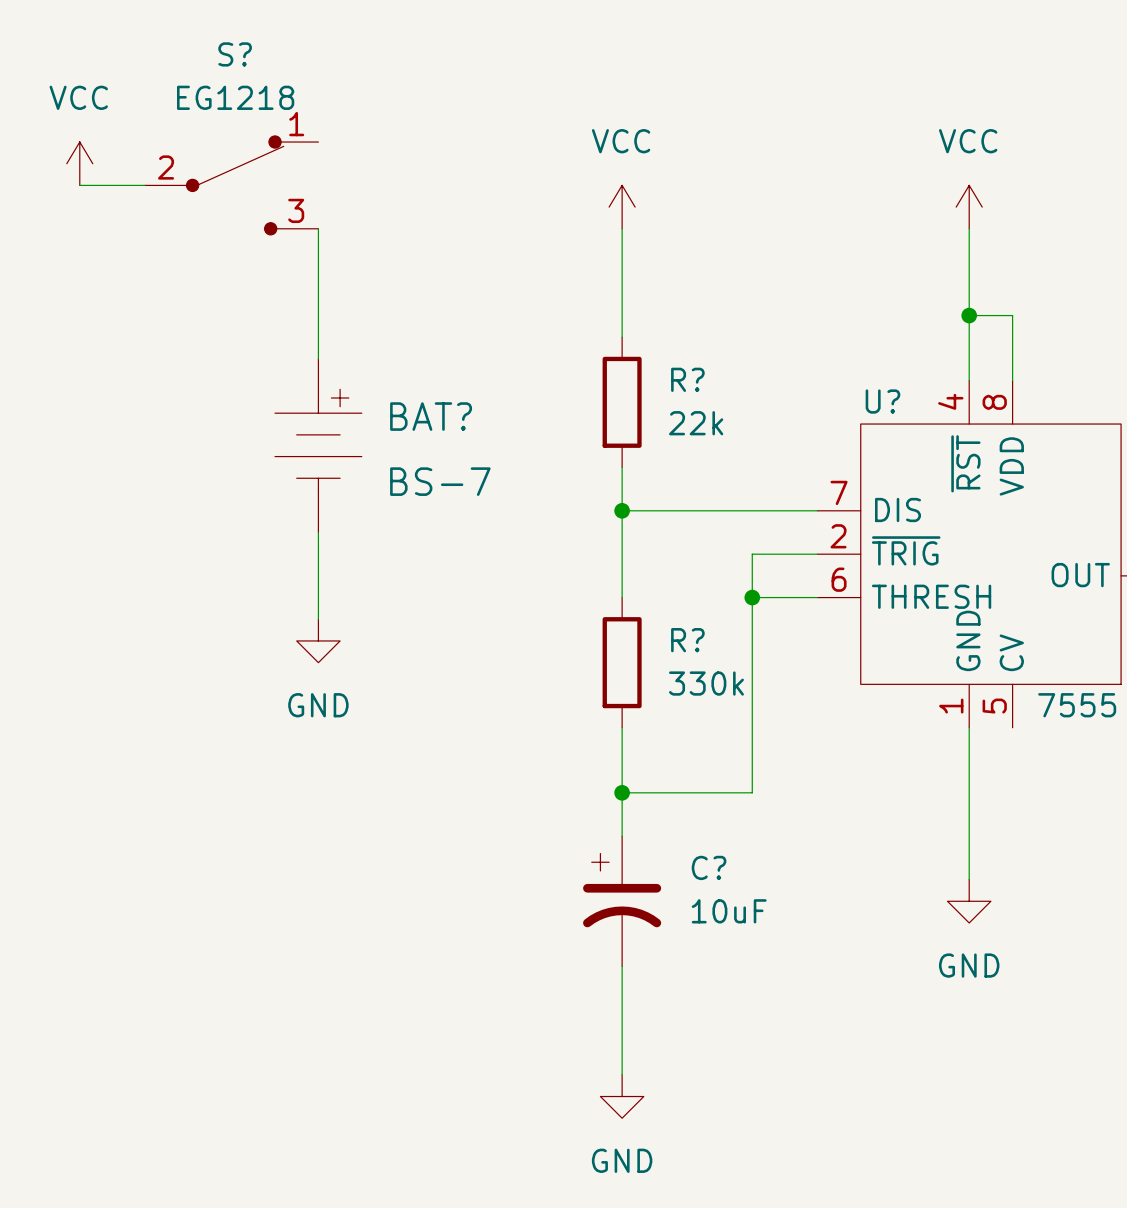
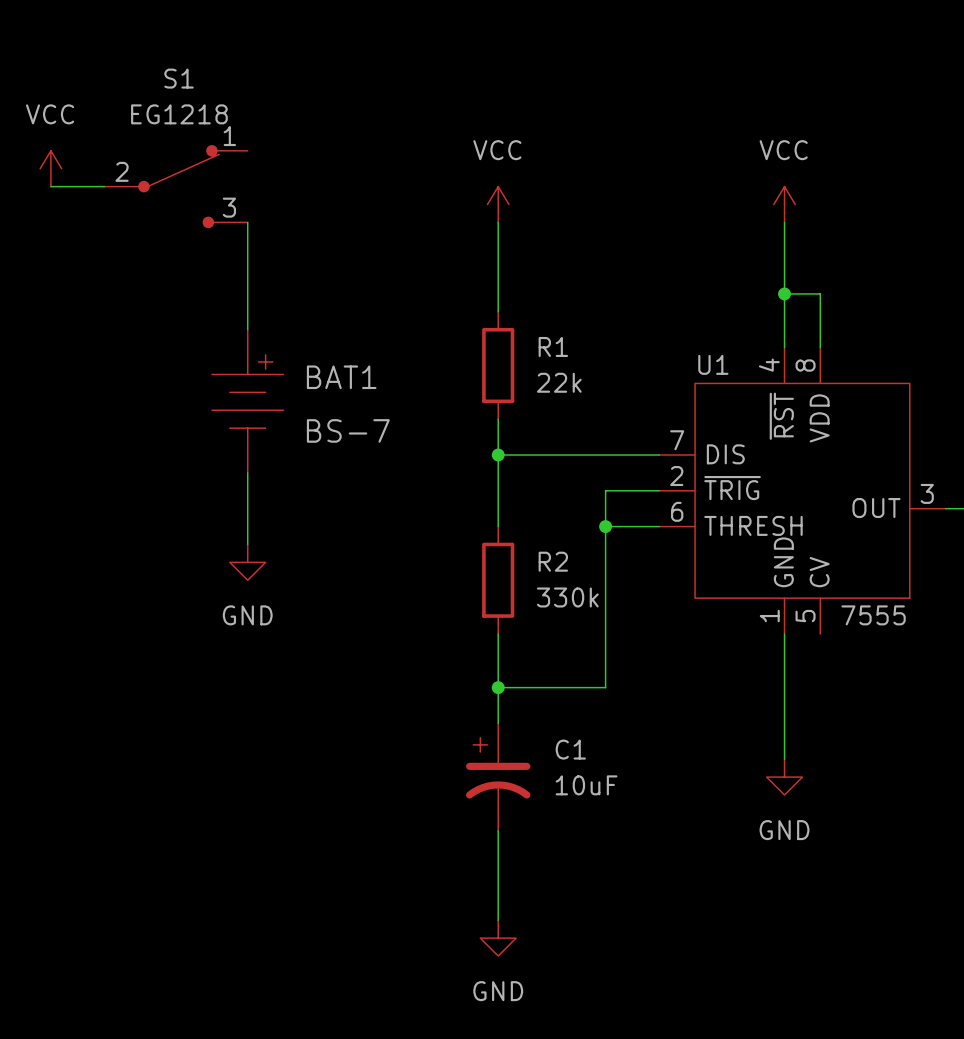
S? name: S? (235, 54) -> S1 (179, 78)
R? name: R? (687, 379) -> R1 (553, 346)
U? name: U? (882, 401) -> U1 (713, 364)
BAT? name: BAT? (431, 416) -> BAT1 (341, 377)
R? name: R? (687, 640) -> R2 (553, 561)
C? name: C? (709, 867) -> C1 (570, 749)

